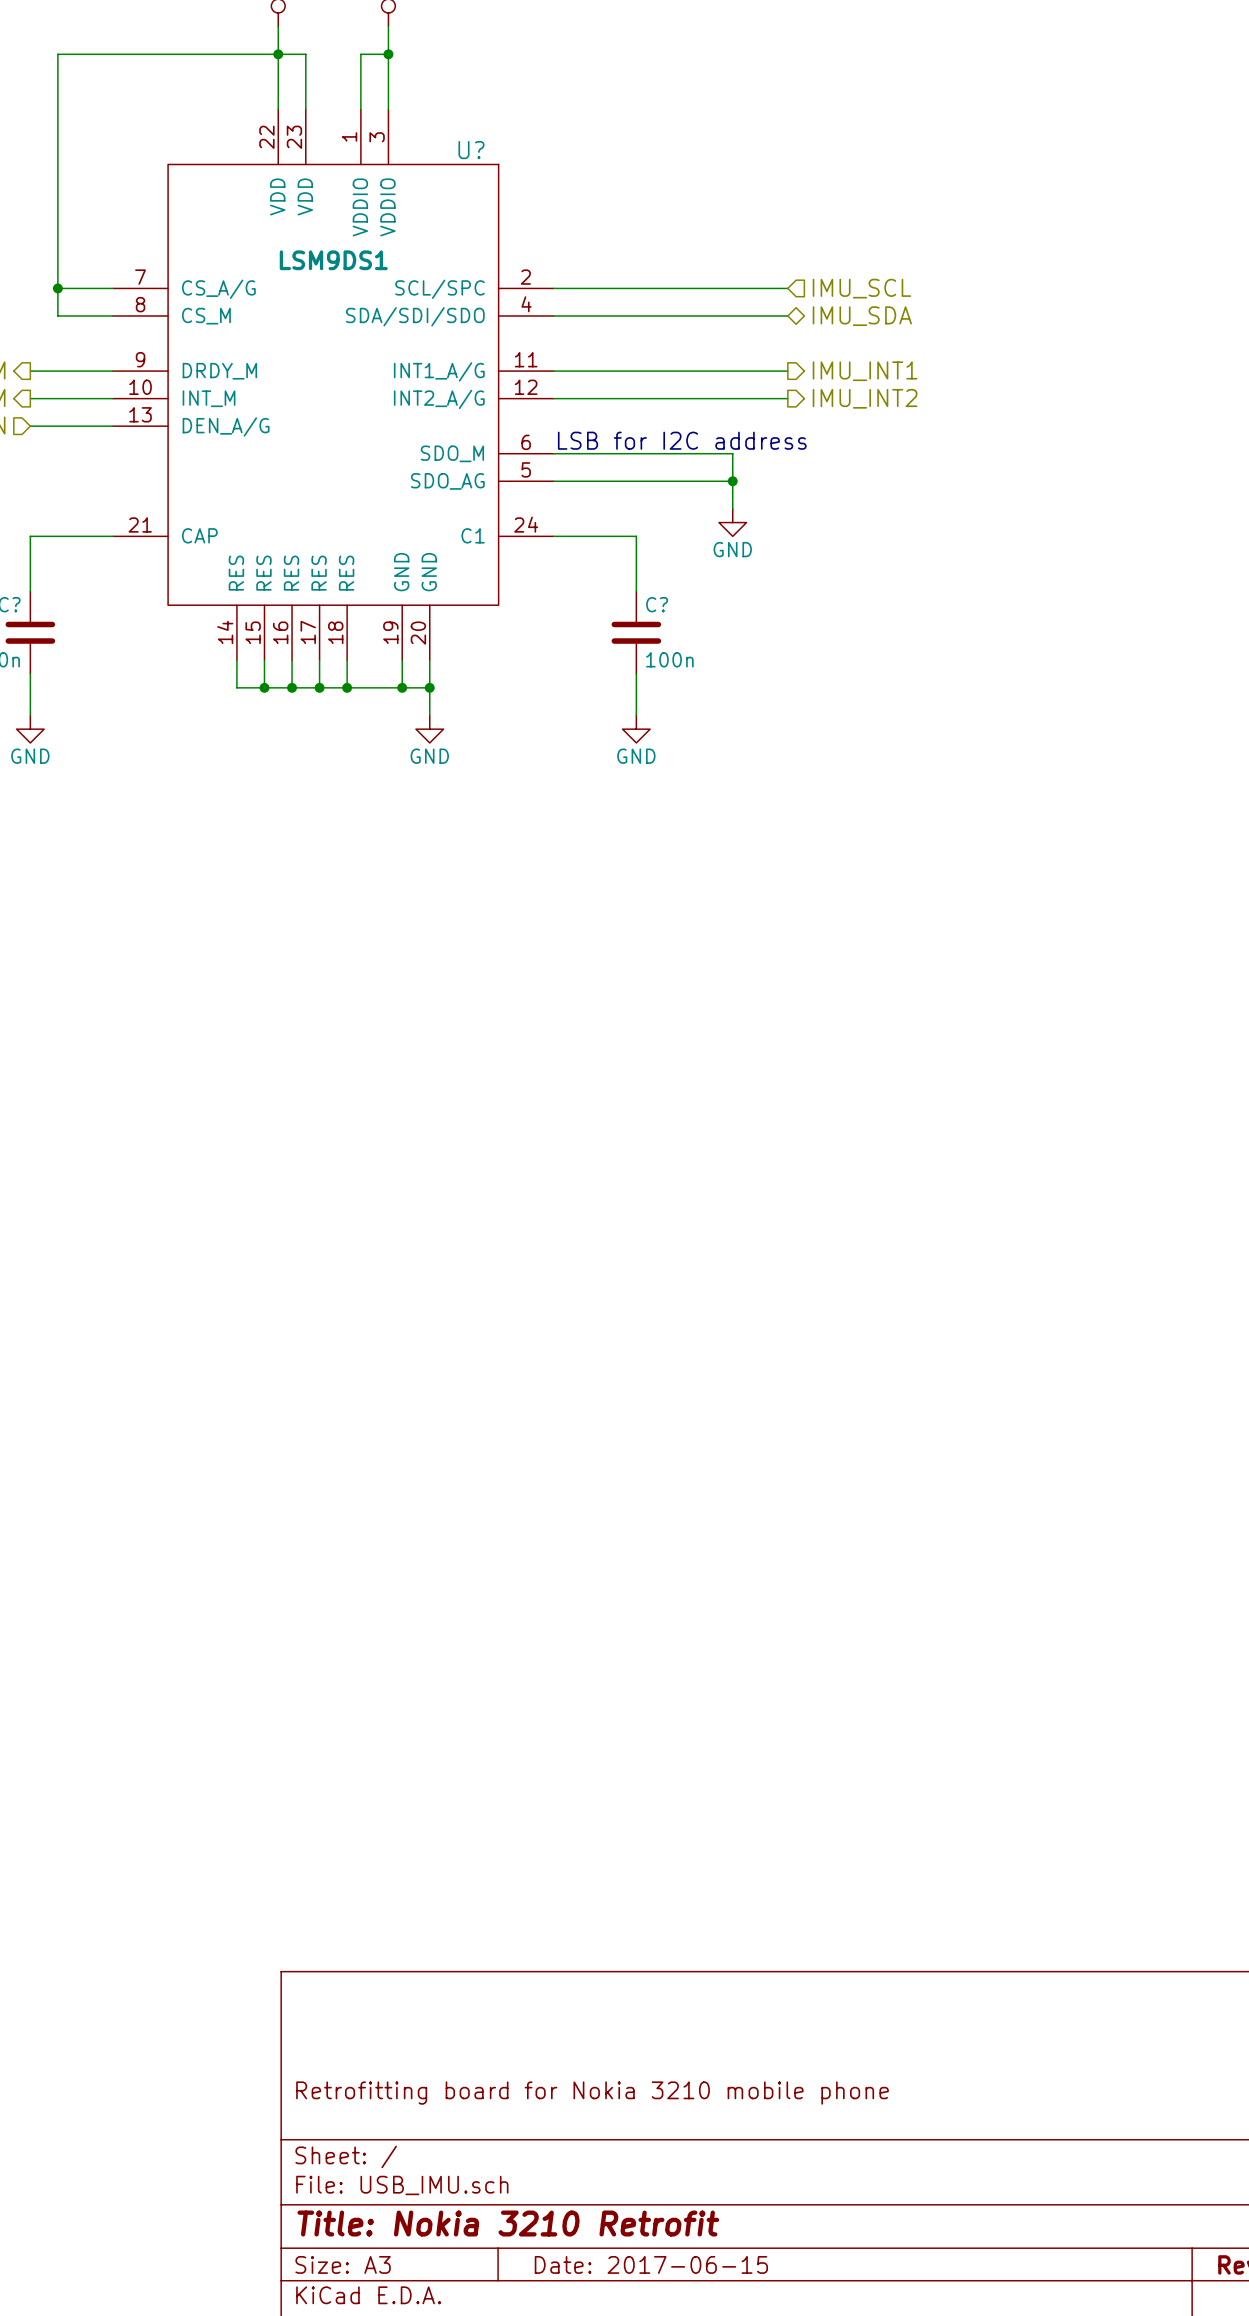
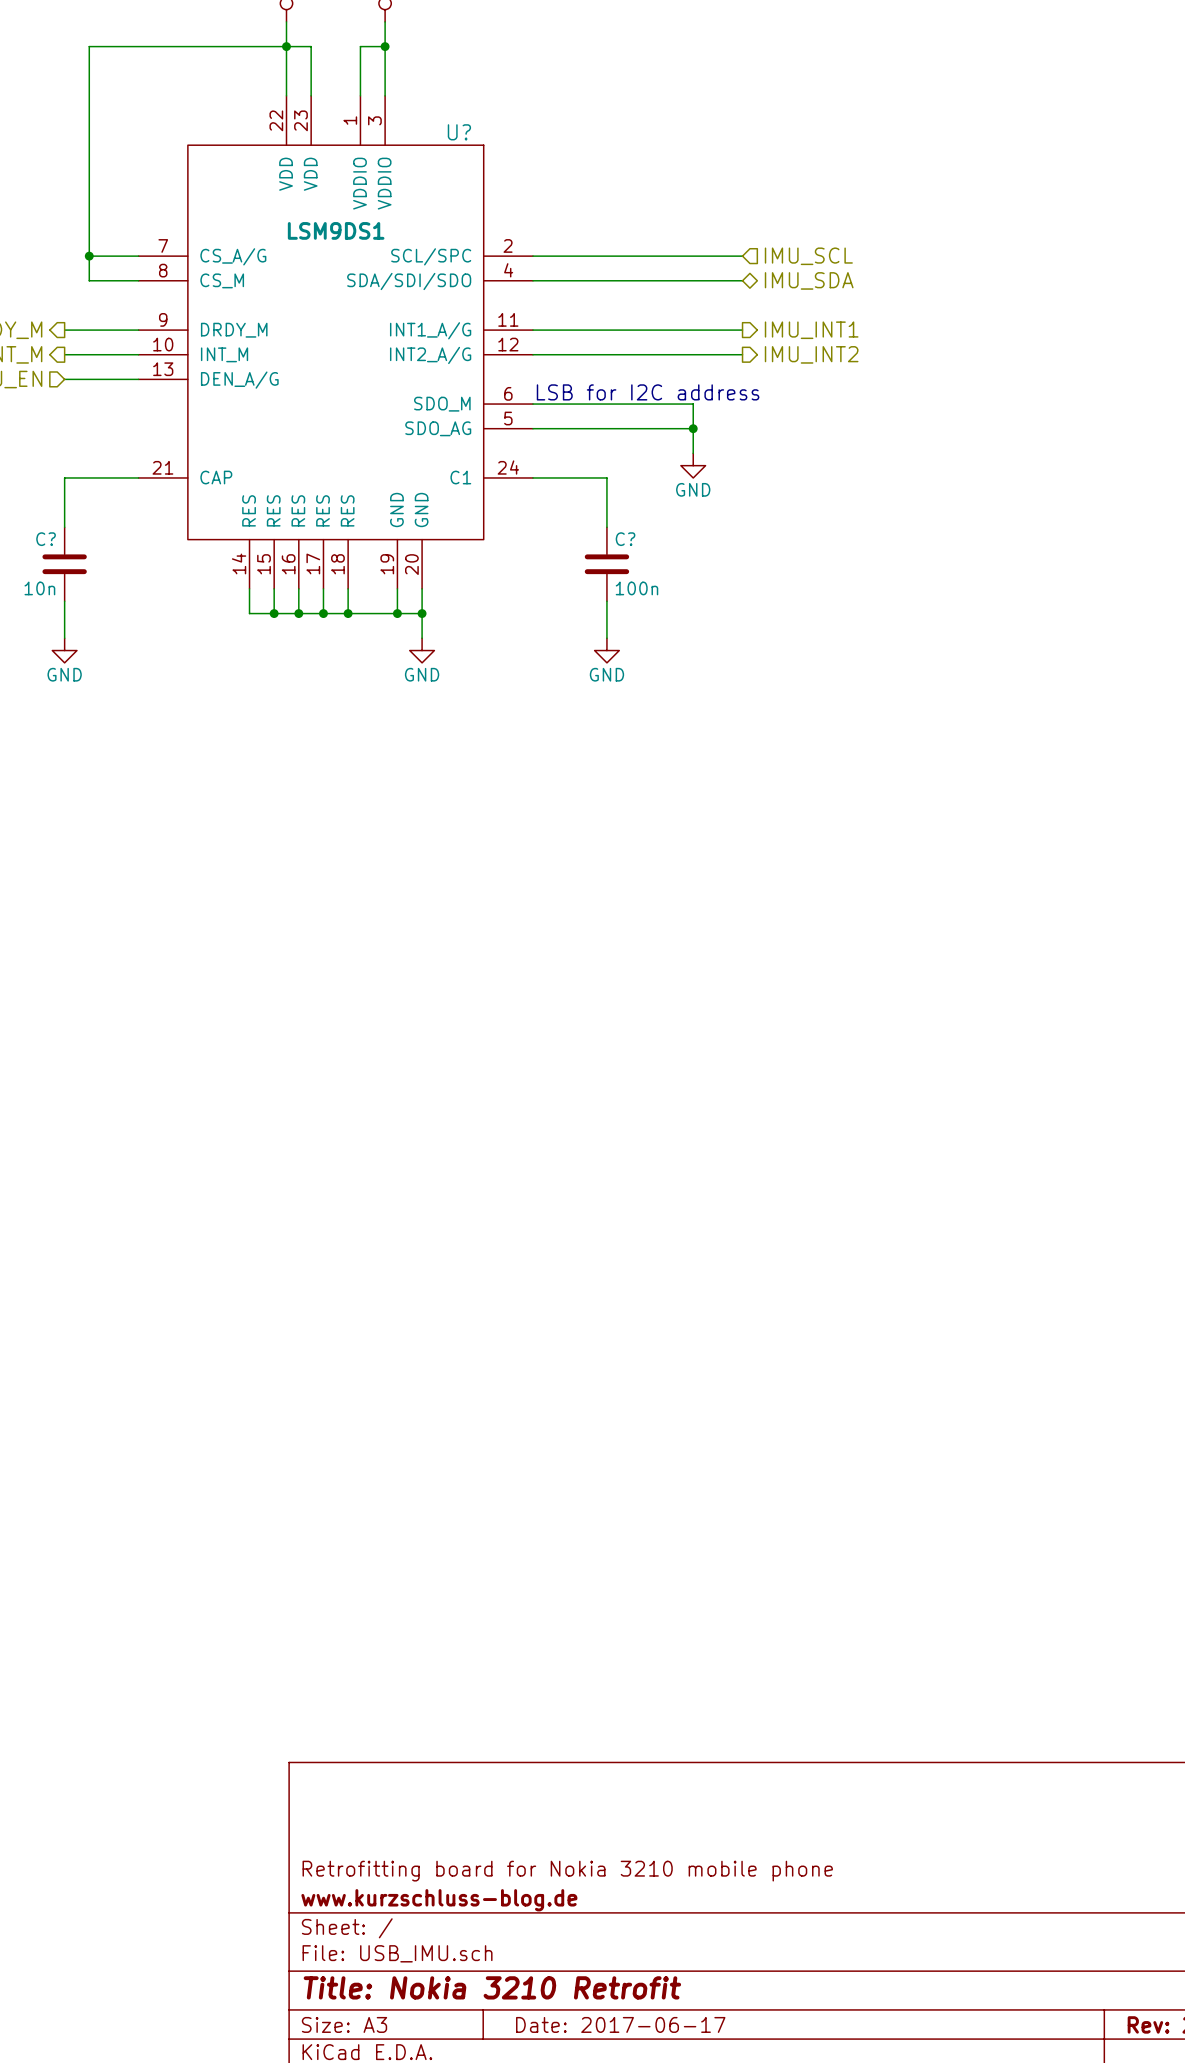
title block: none -> www.kurzschluss-blog.de (439, 1900)
title block: Date: 2017-06-15 (651, 2264) -> Date: 2017-06-17 (620, 2024)

